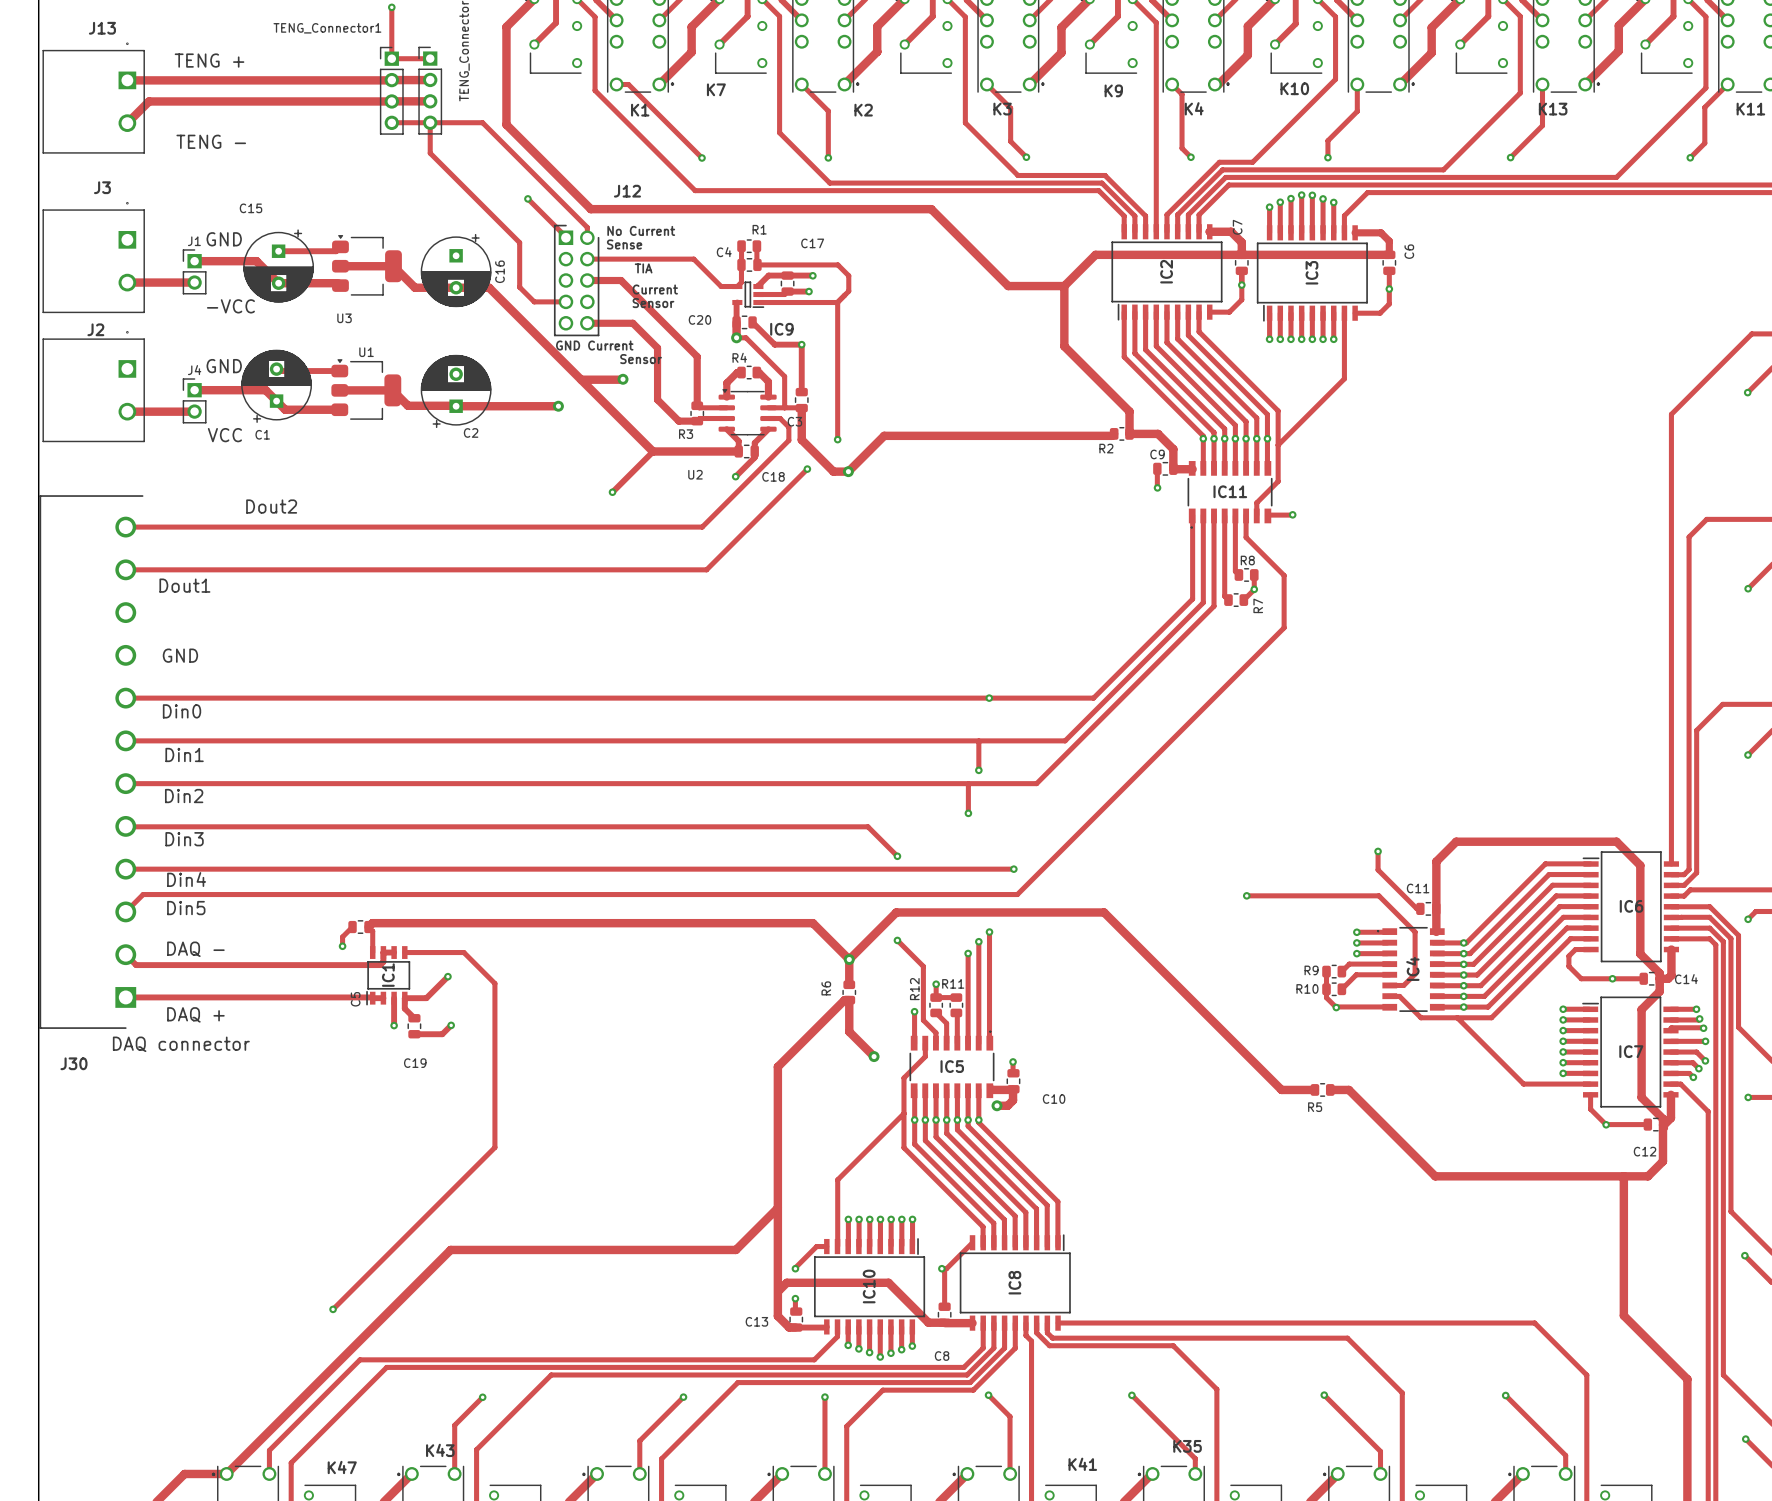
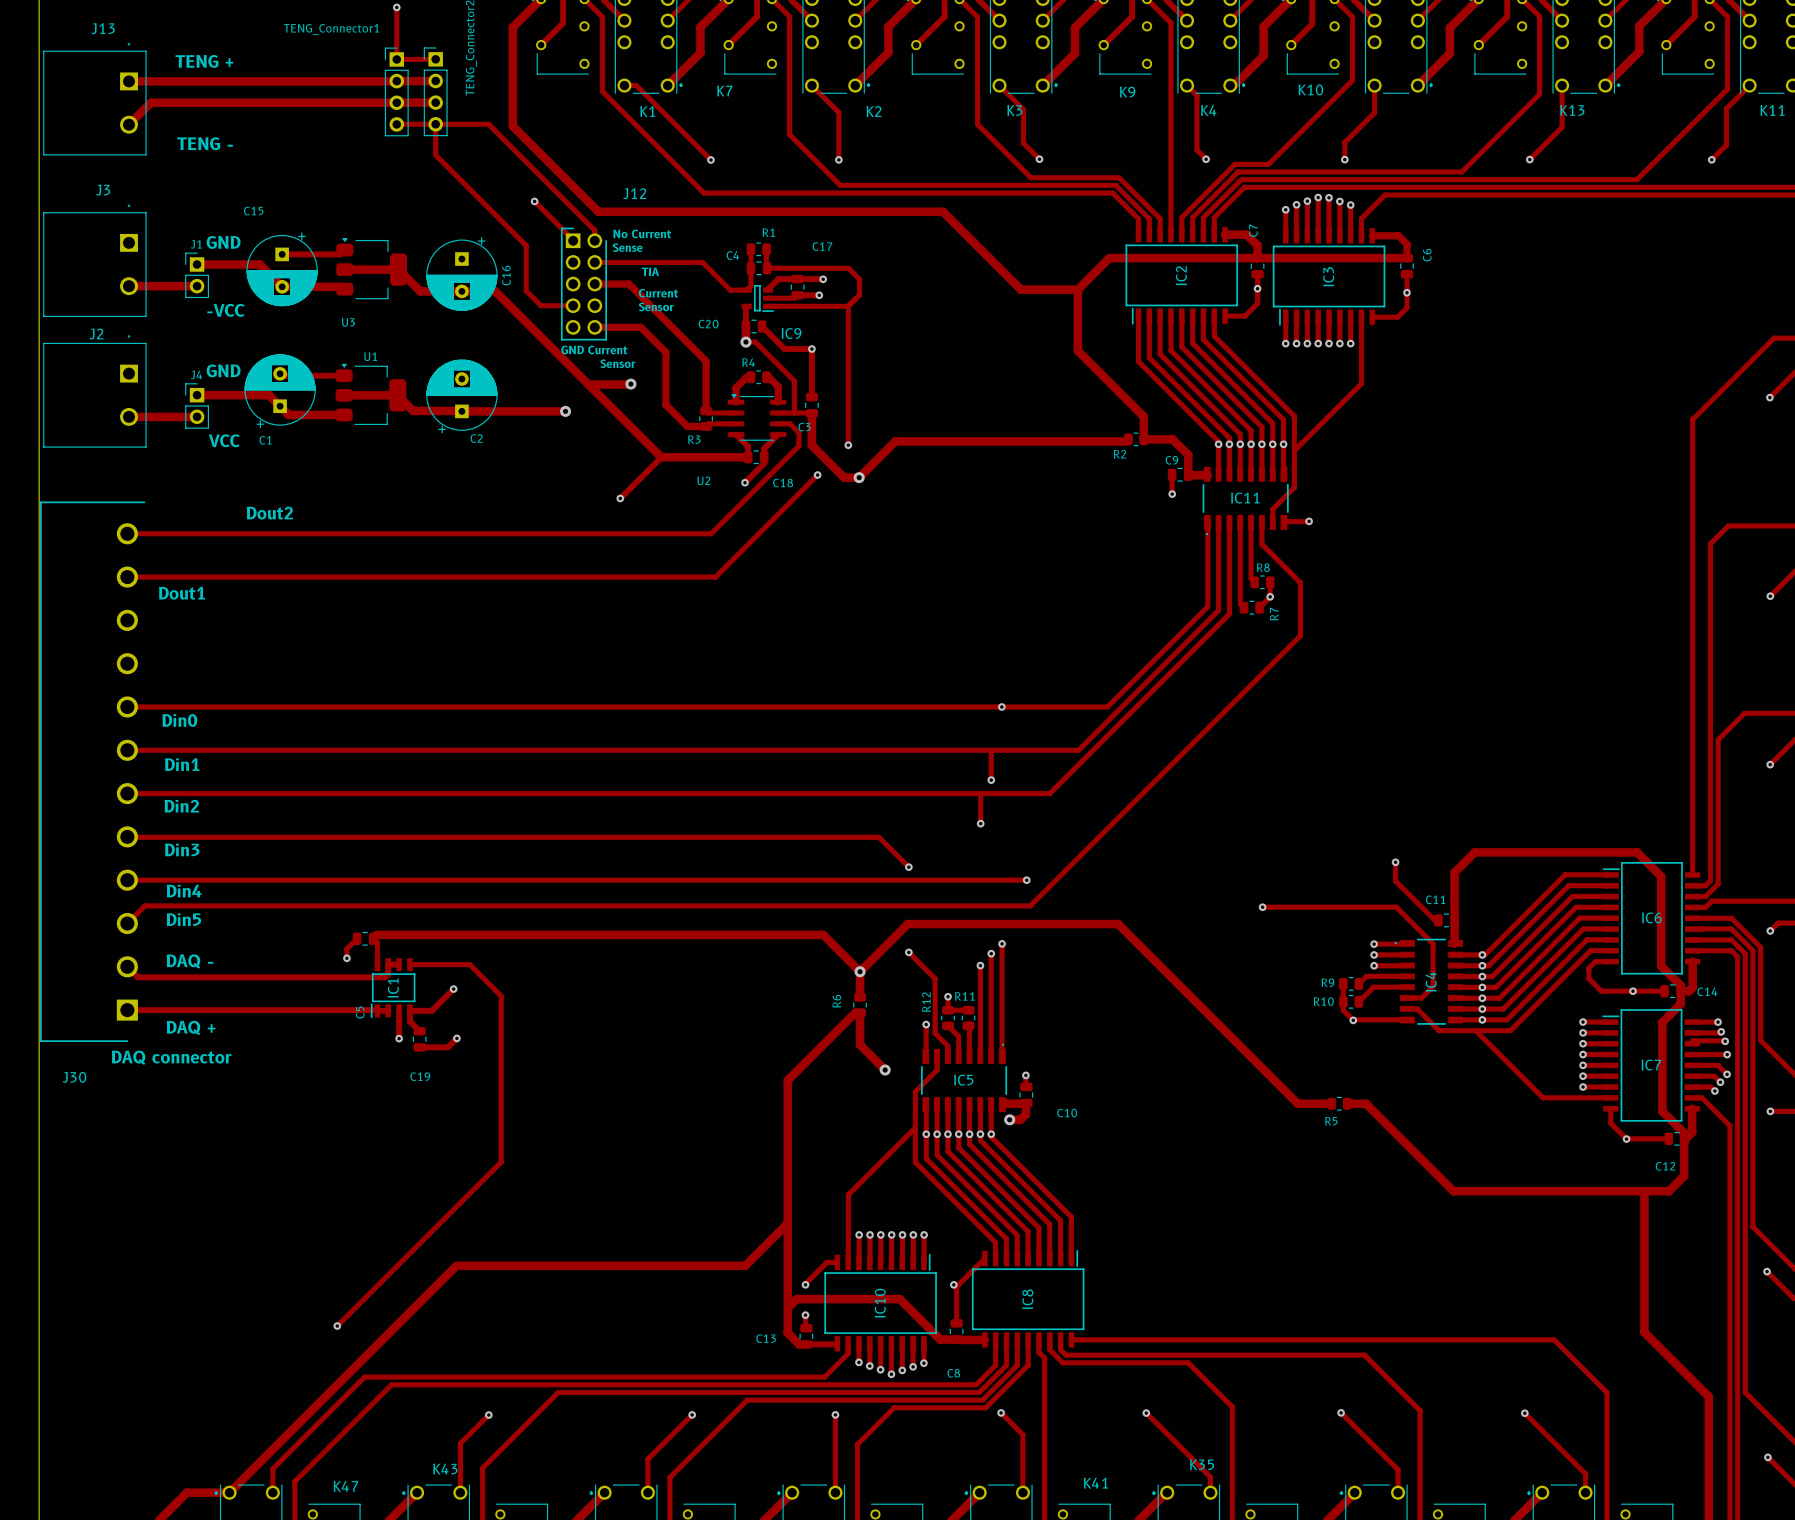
text: GND (180, 655) -> none

